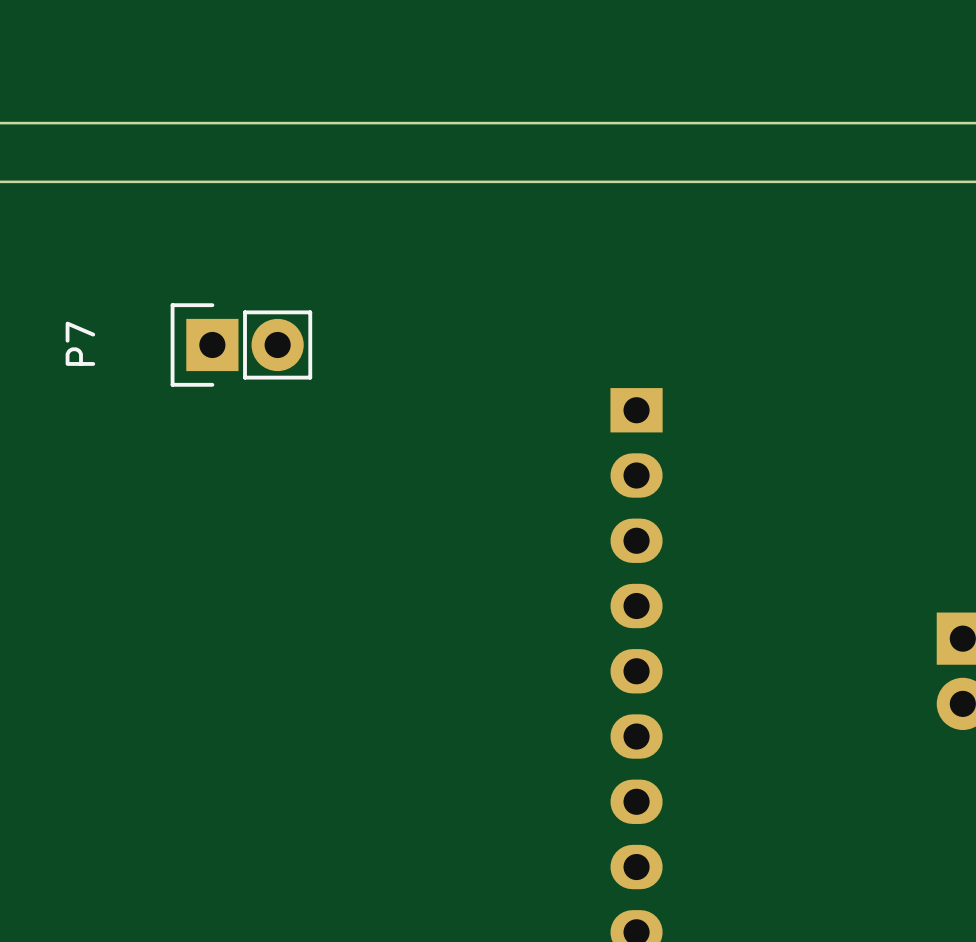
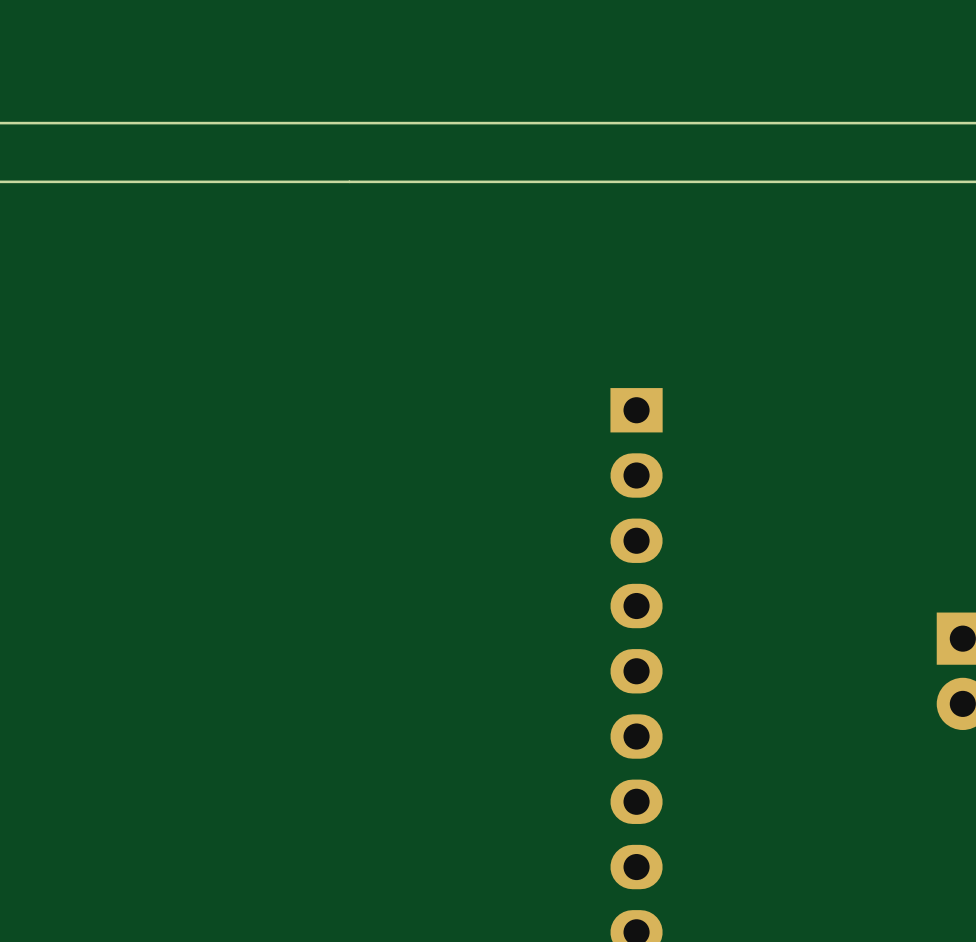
P7: (241, 344) -> none

